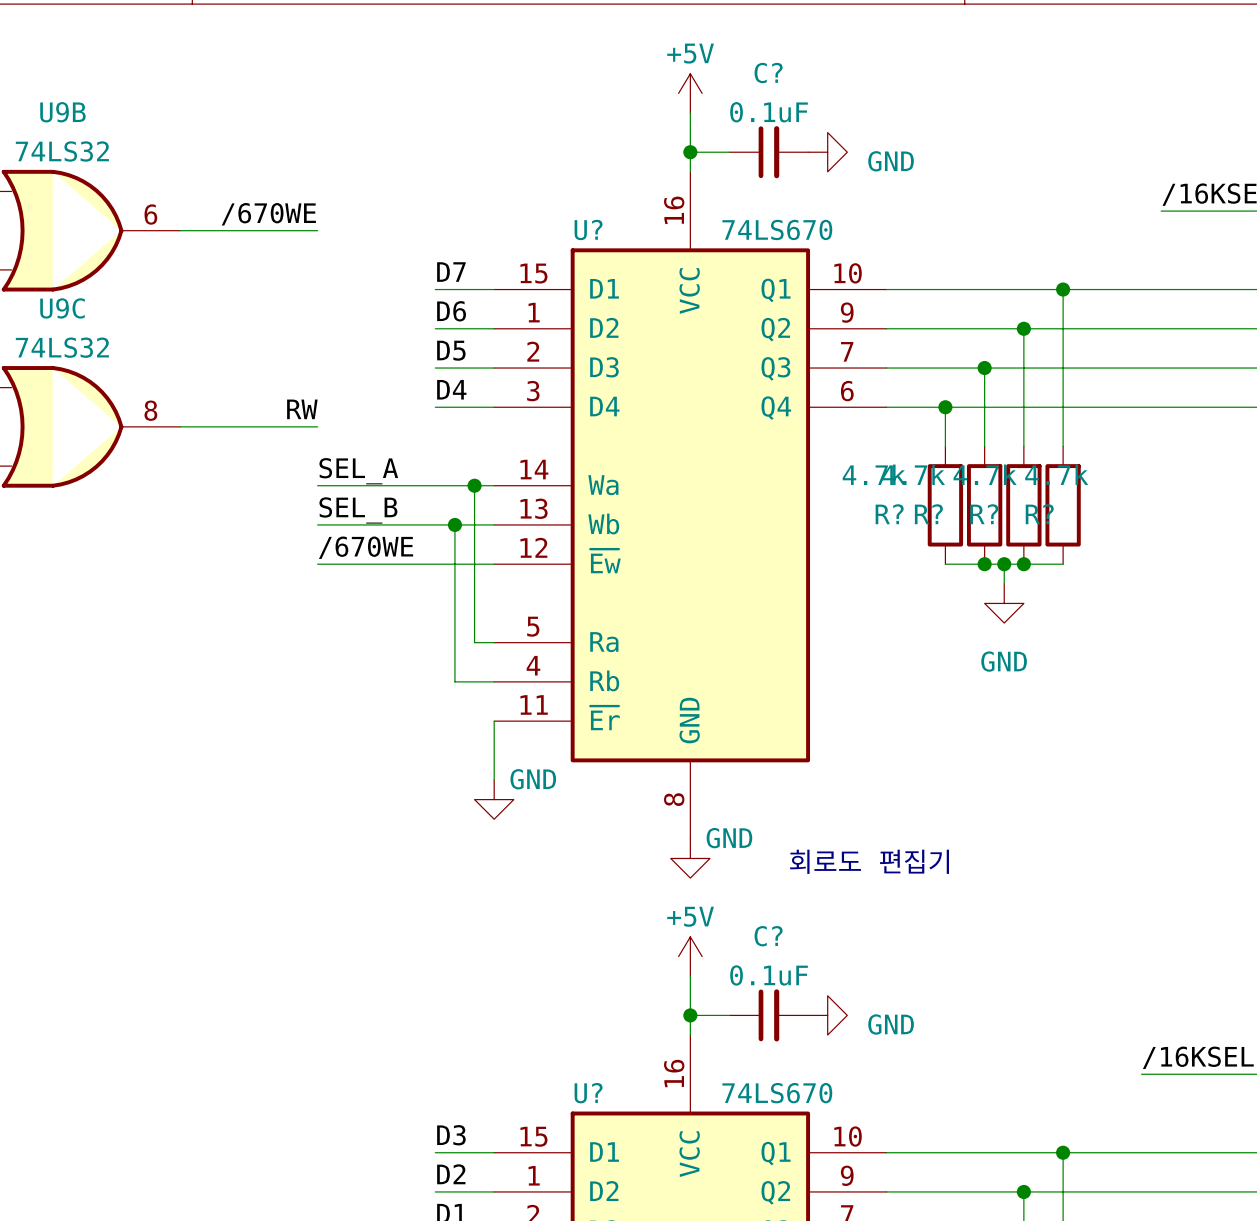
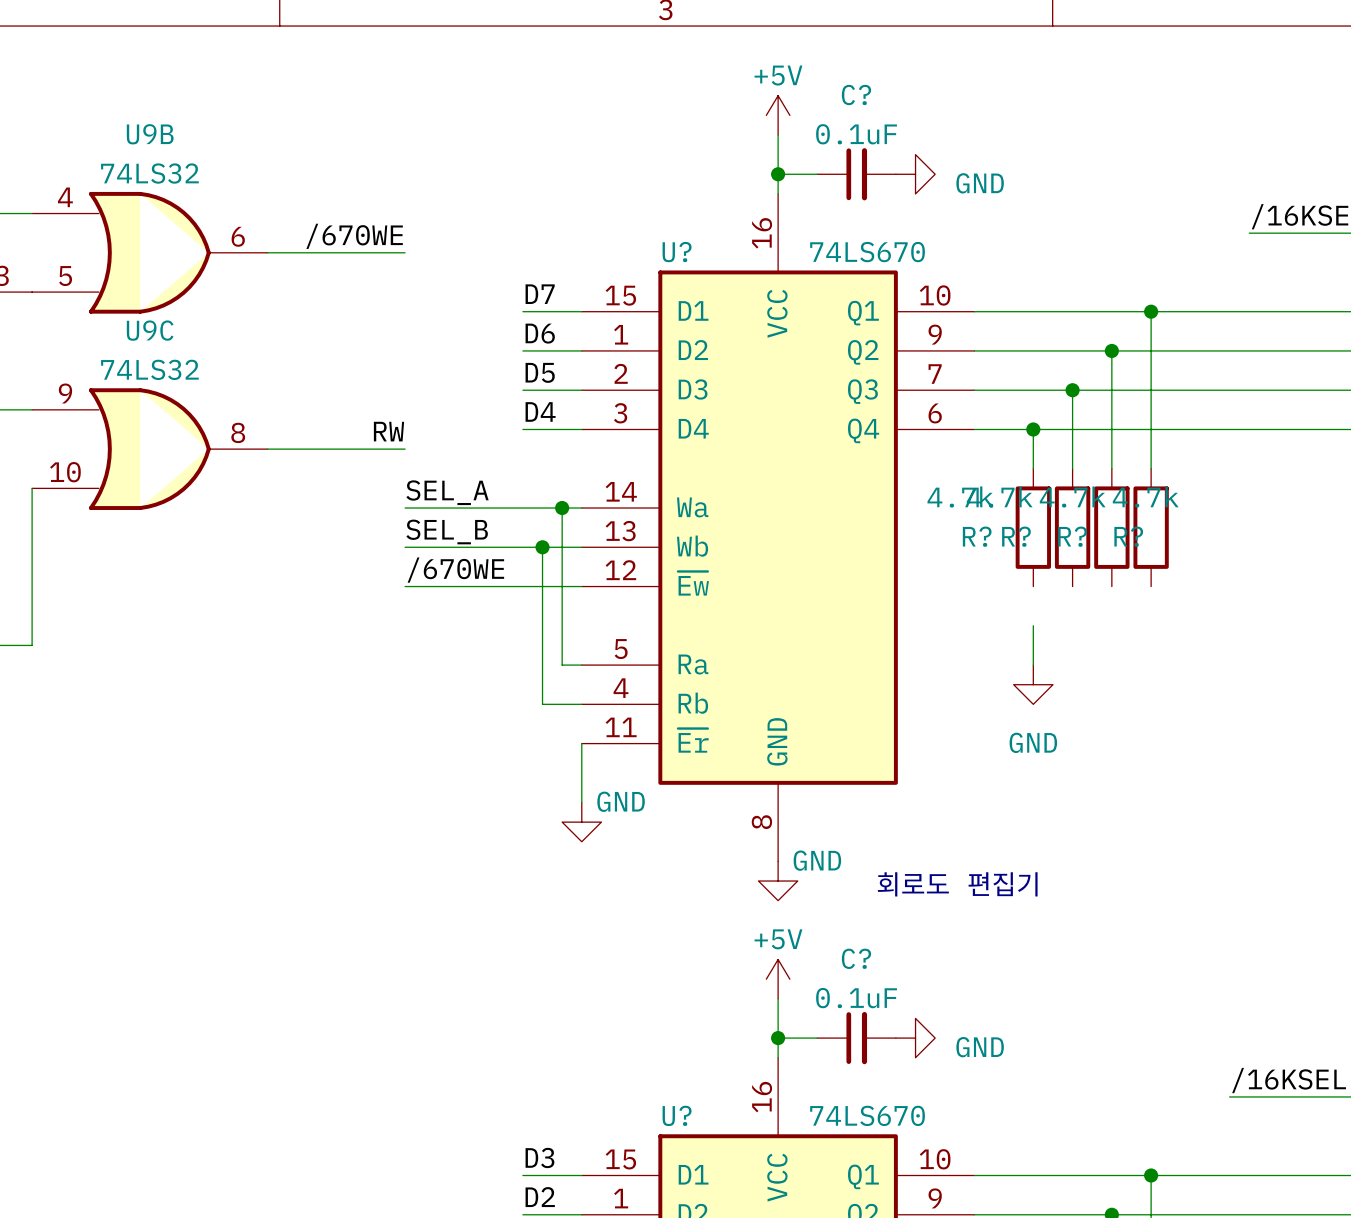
wire: (945, 564) (1063, 564) -> none
junction: (984, 564) -> none
wire: (1004, 564) (1004, 583) -> none
junction: (1004, 564) -> none
junction: (1023, 564) -> none
wire: none -> (1033, 625) (1033, 665)
power symbol position: GND (1004, 603) -> GND (1033, 684)

